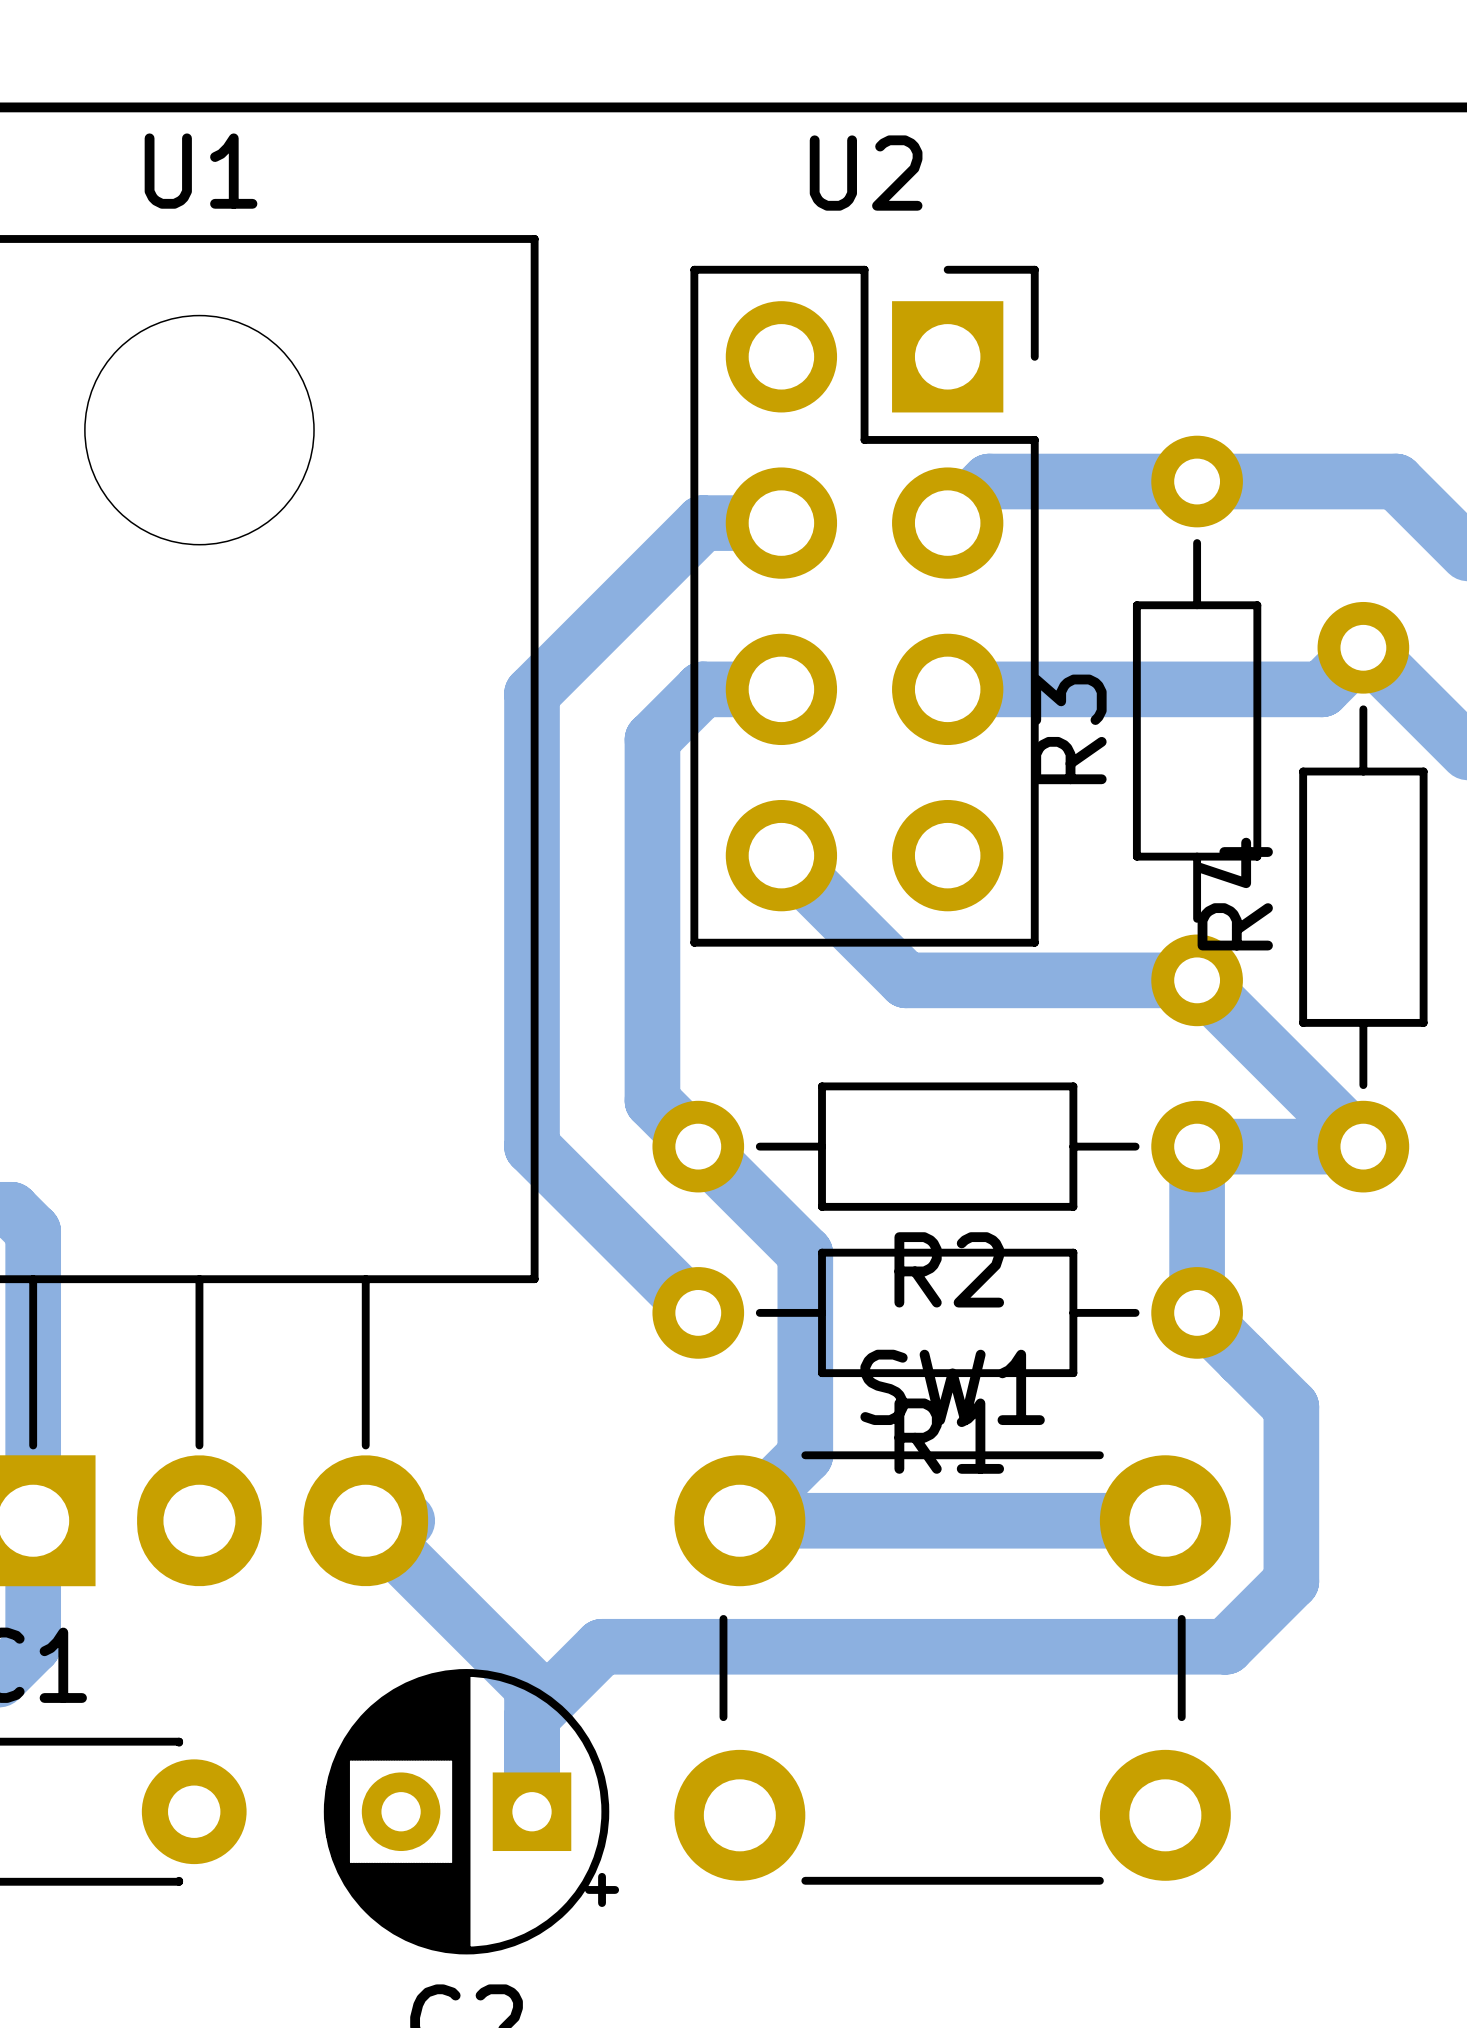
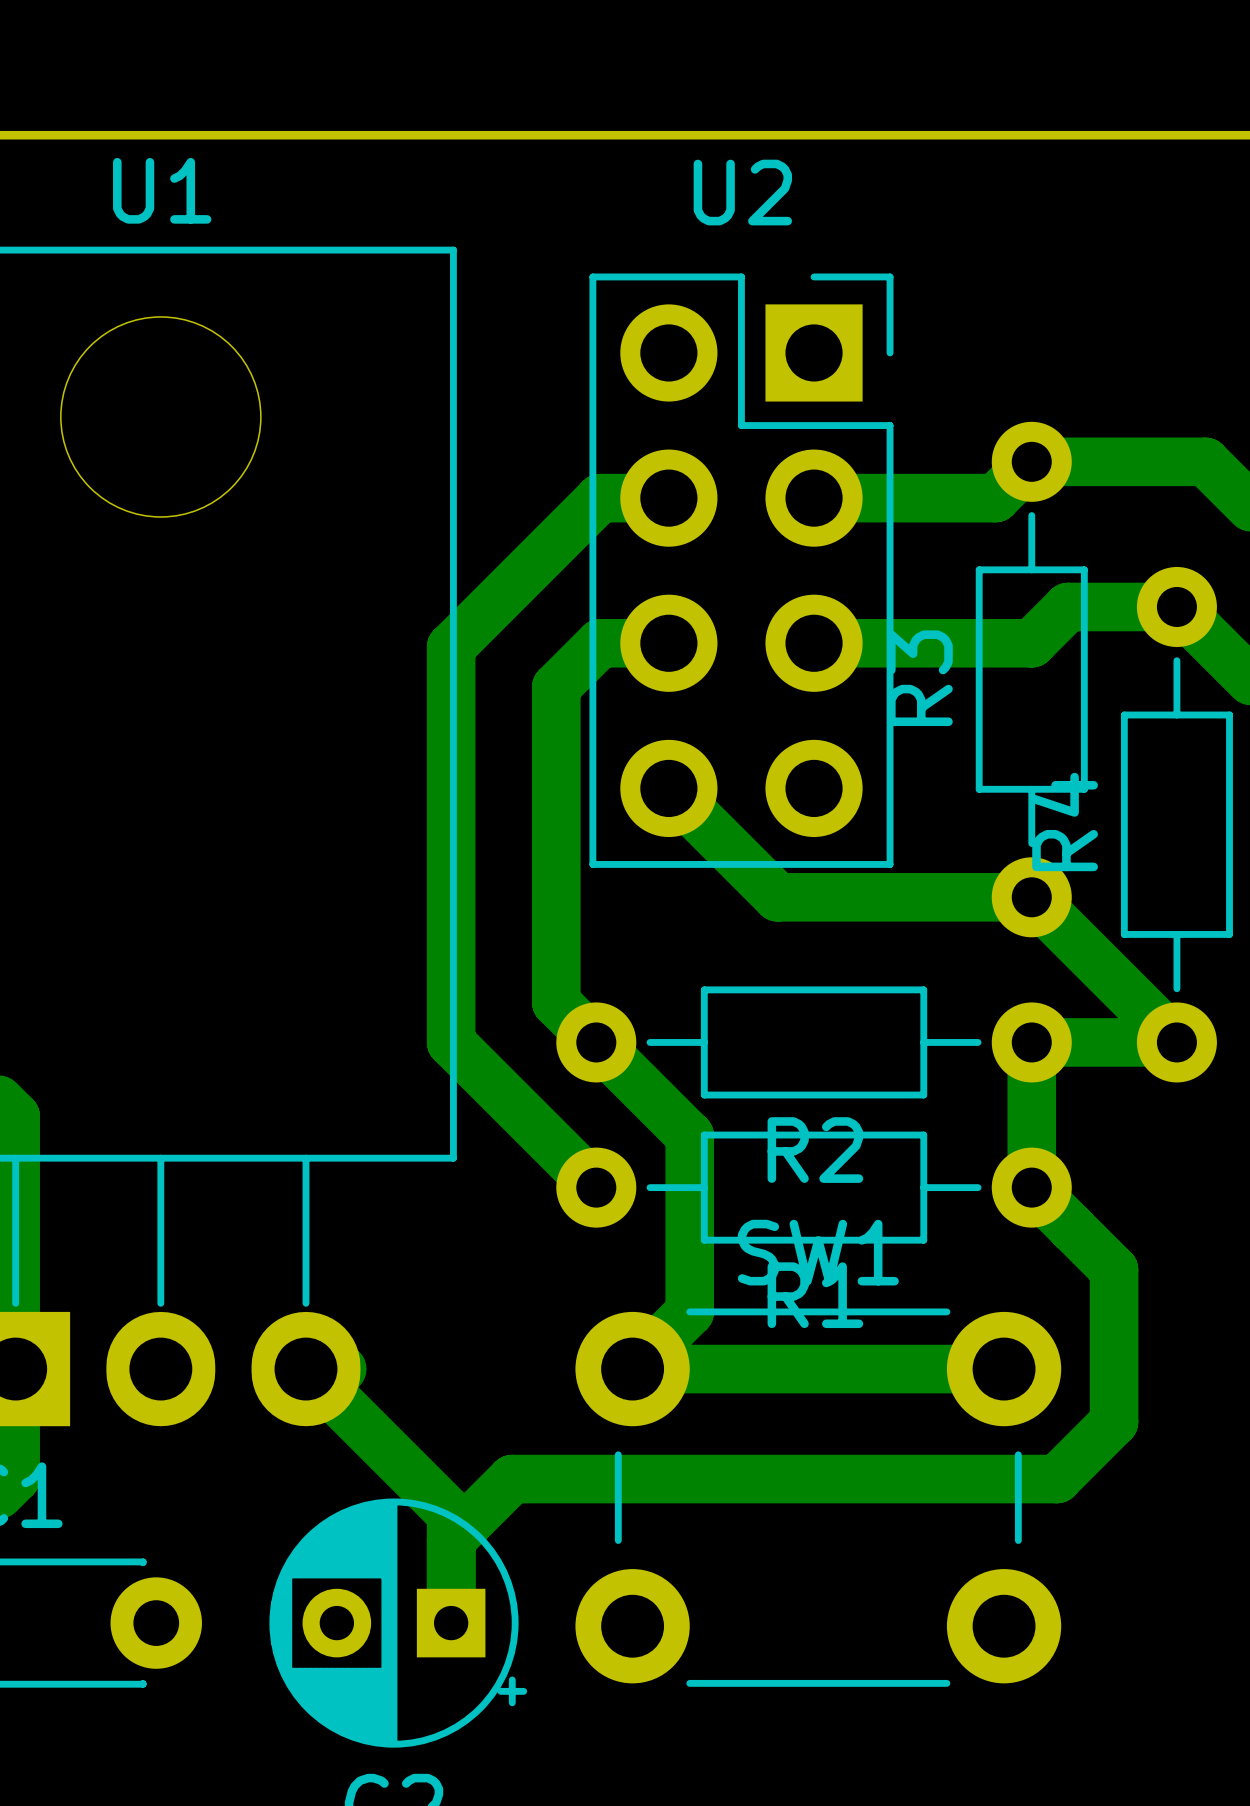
bottom track: (1197, 481) (989, 481) (947, 523) -> (1031, 461) (995, 498) (814, 498)
bottom track: (1363, 647) (1321, 689) (1197, 689) -> (1176, 606) (1068, 606) (1031, 643)

